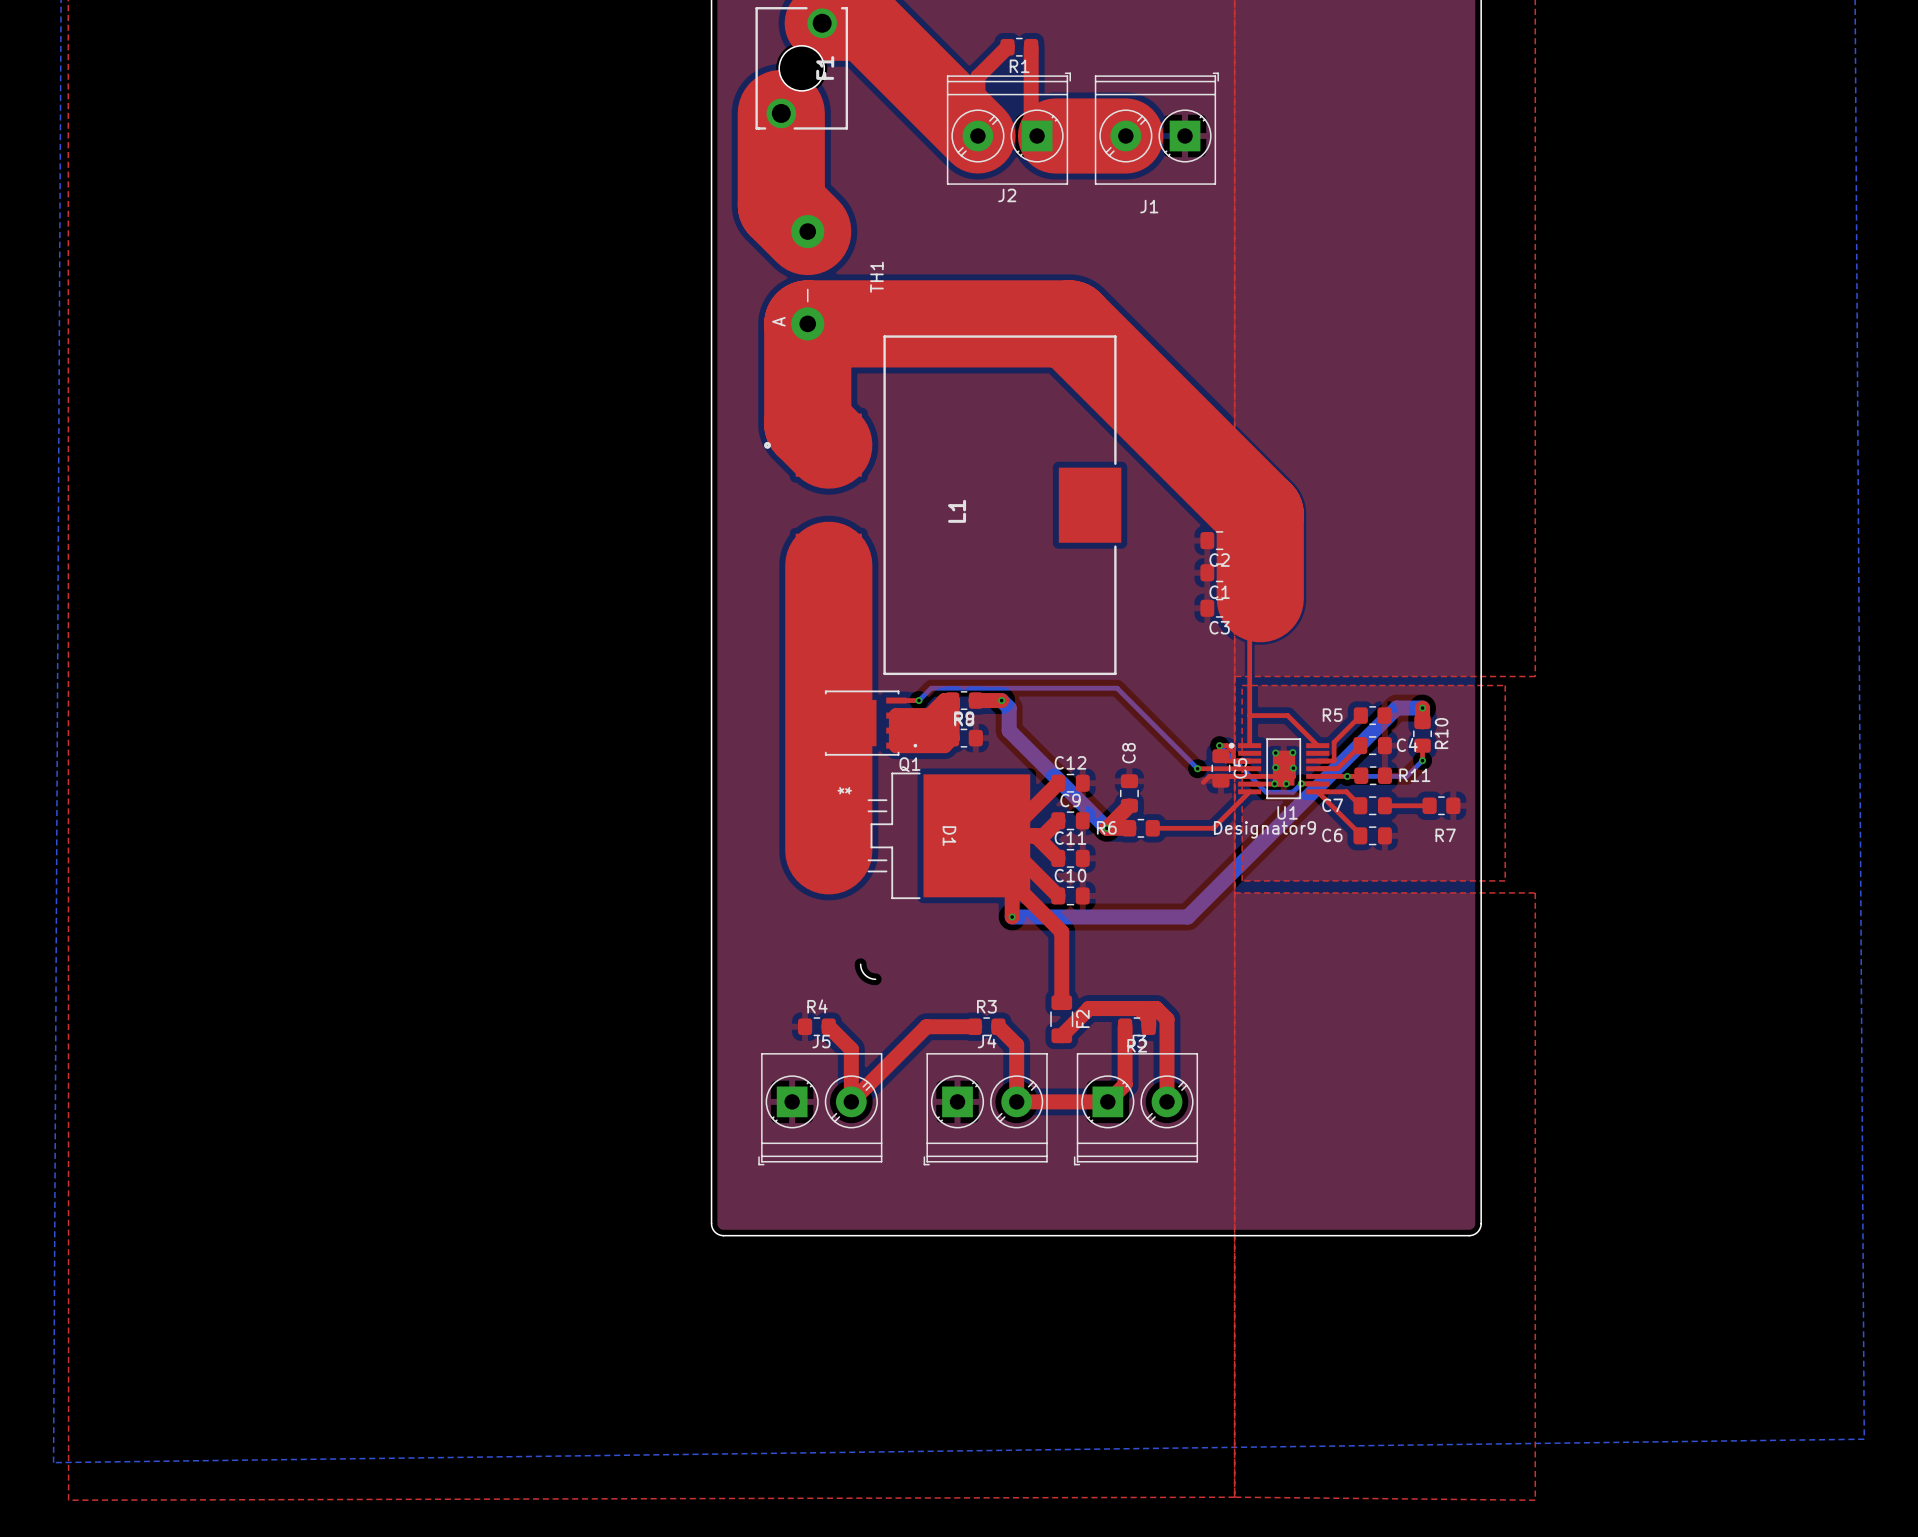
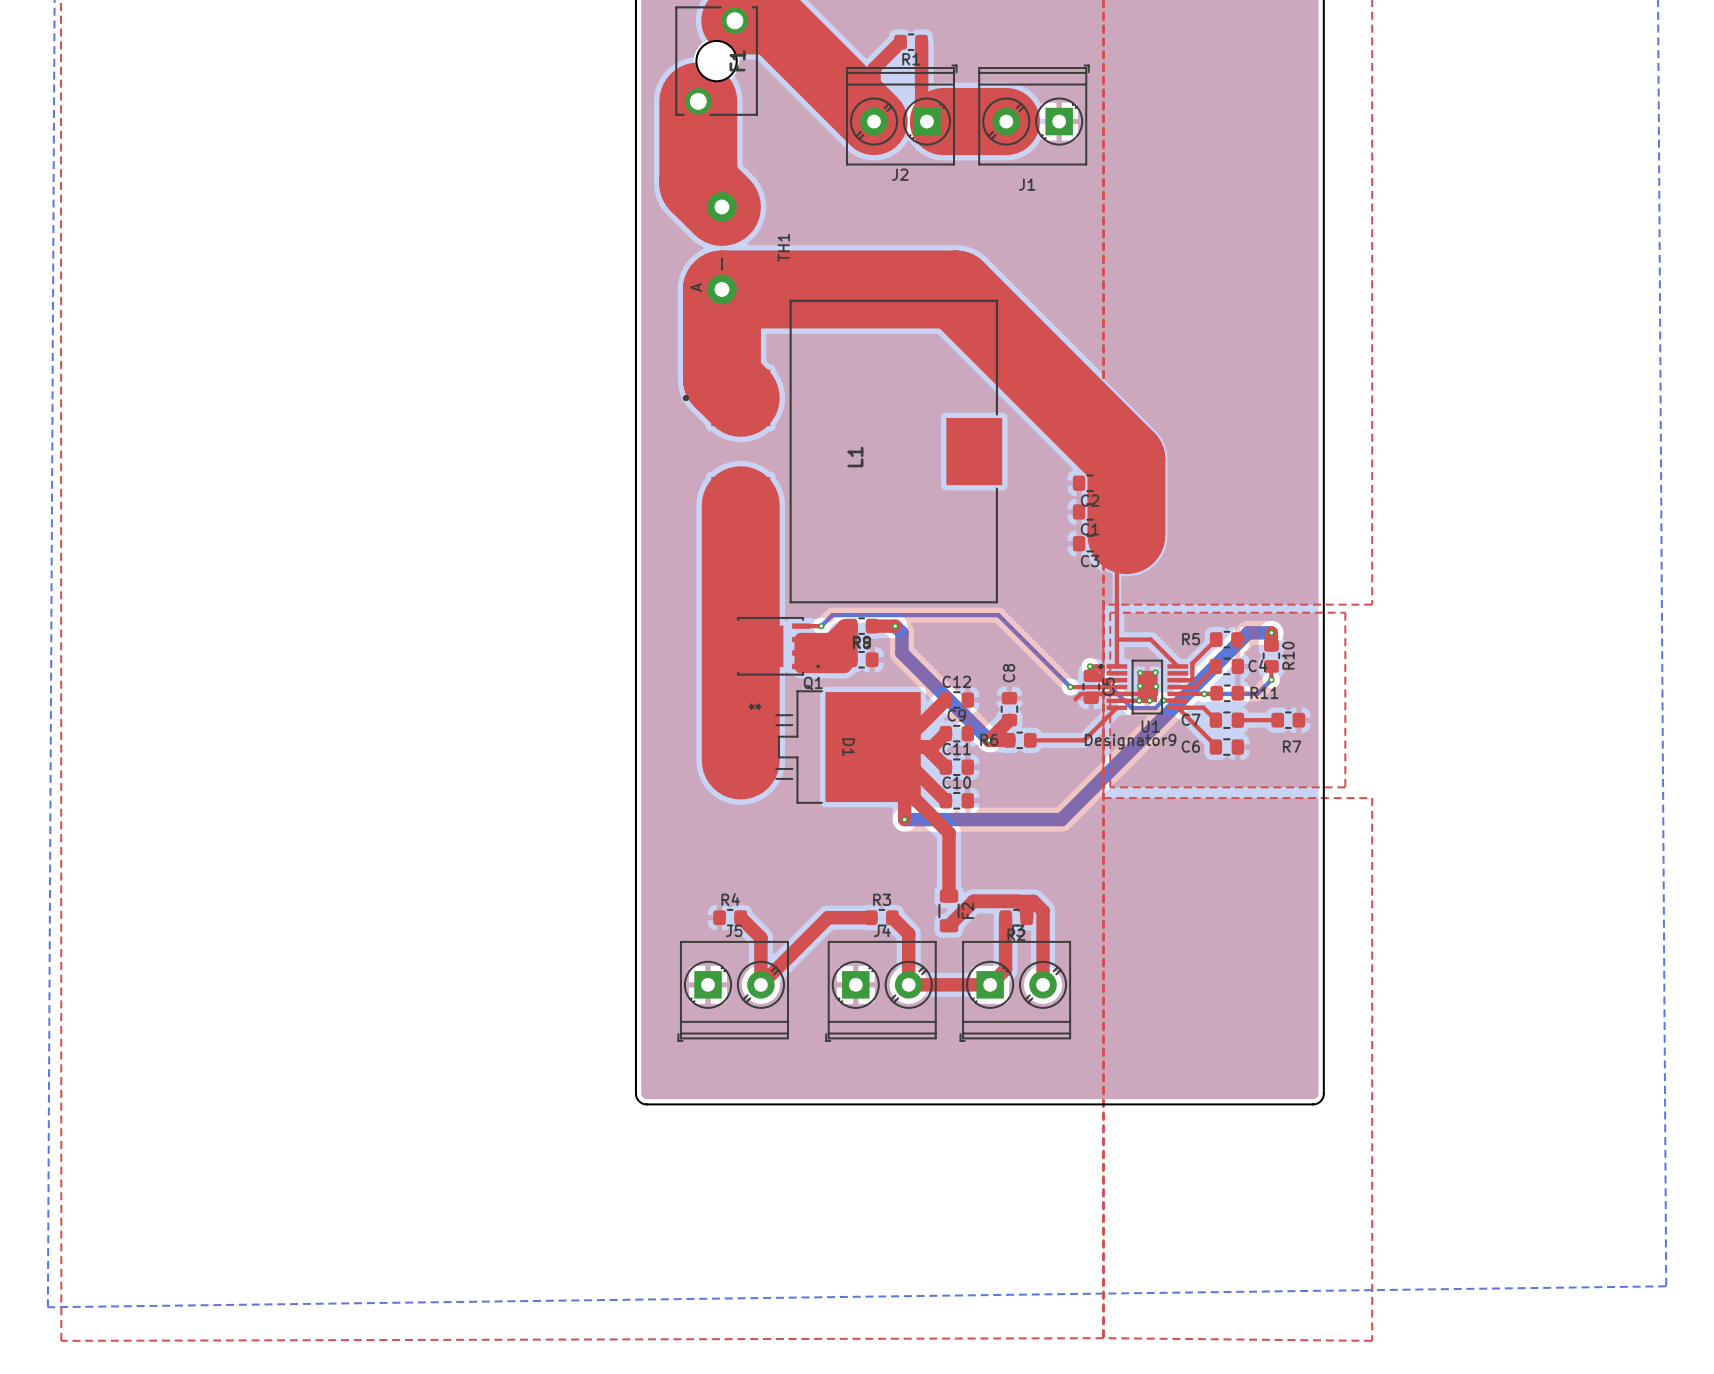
board edge: (860, 964) (865, 974) (875, 979) -> none

